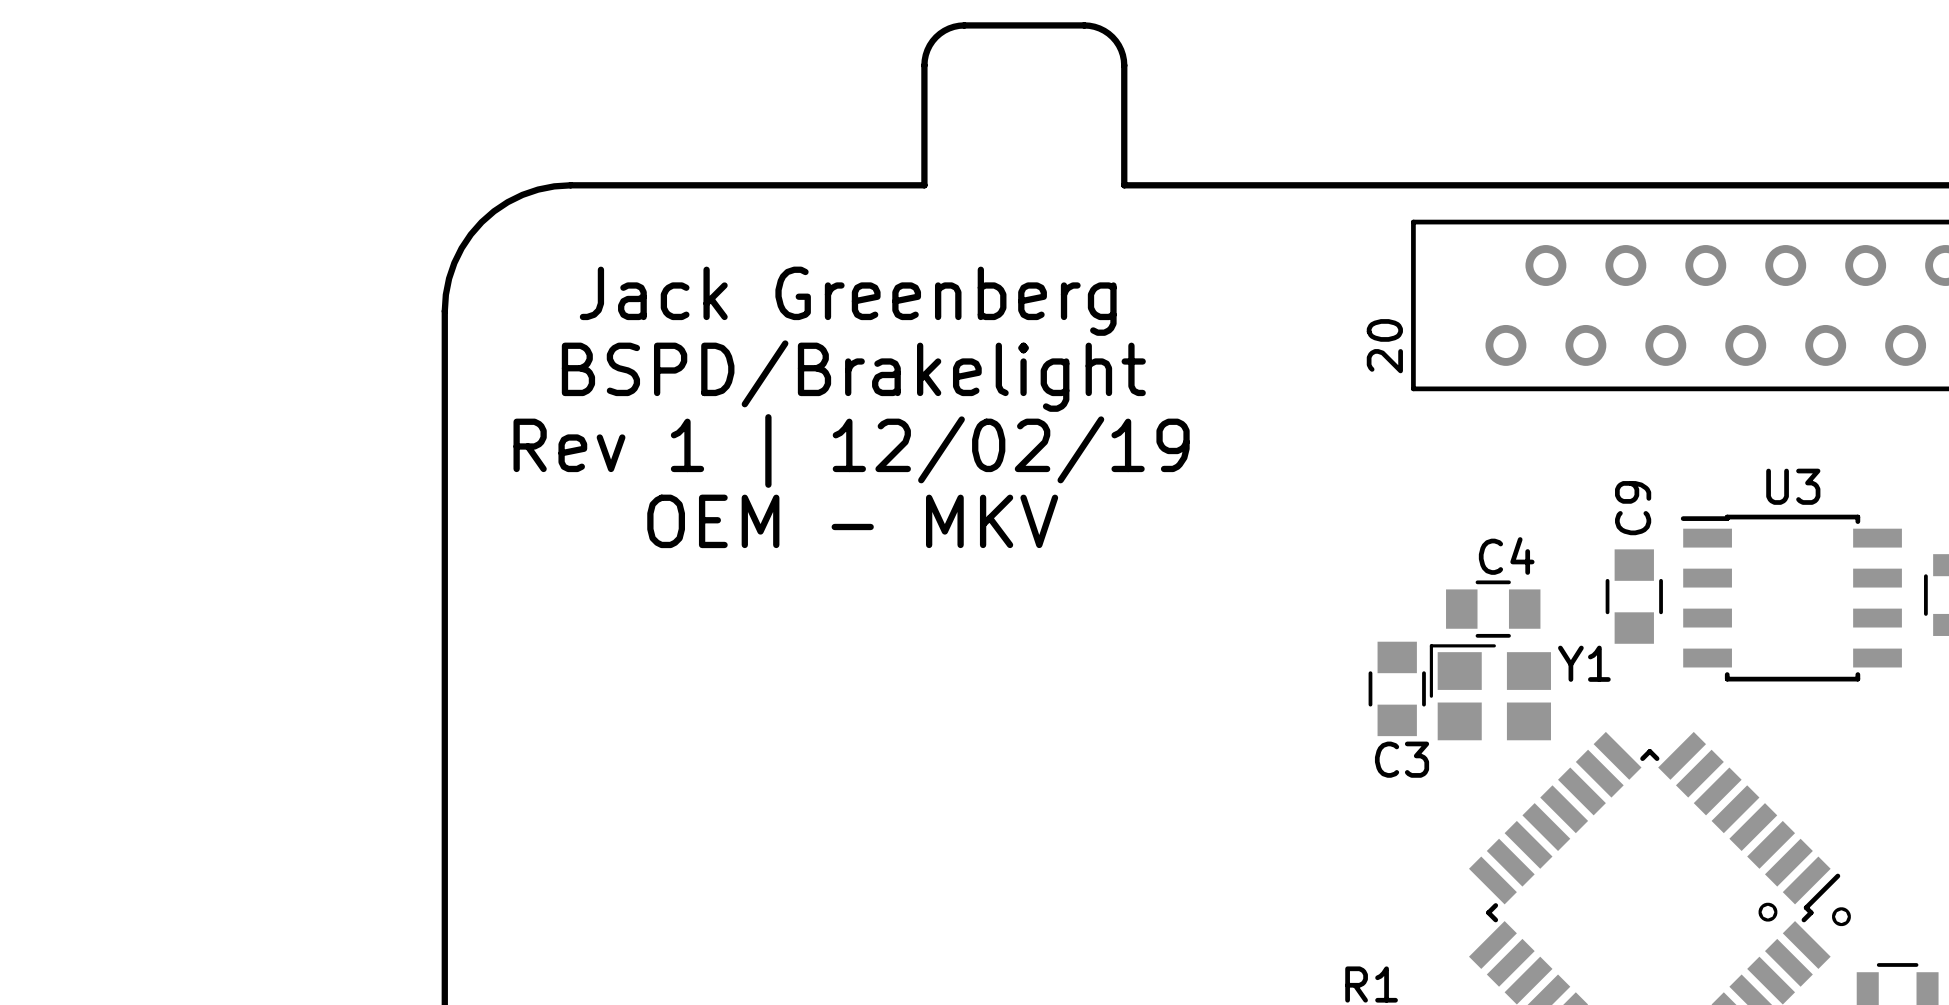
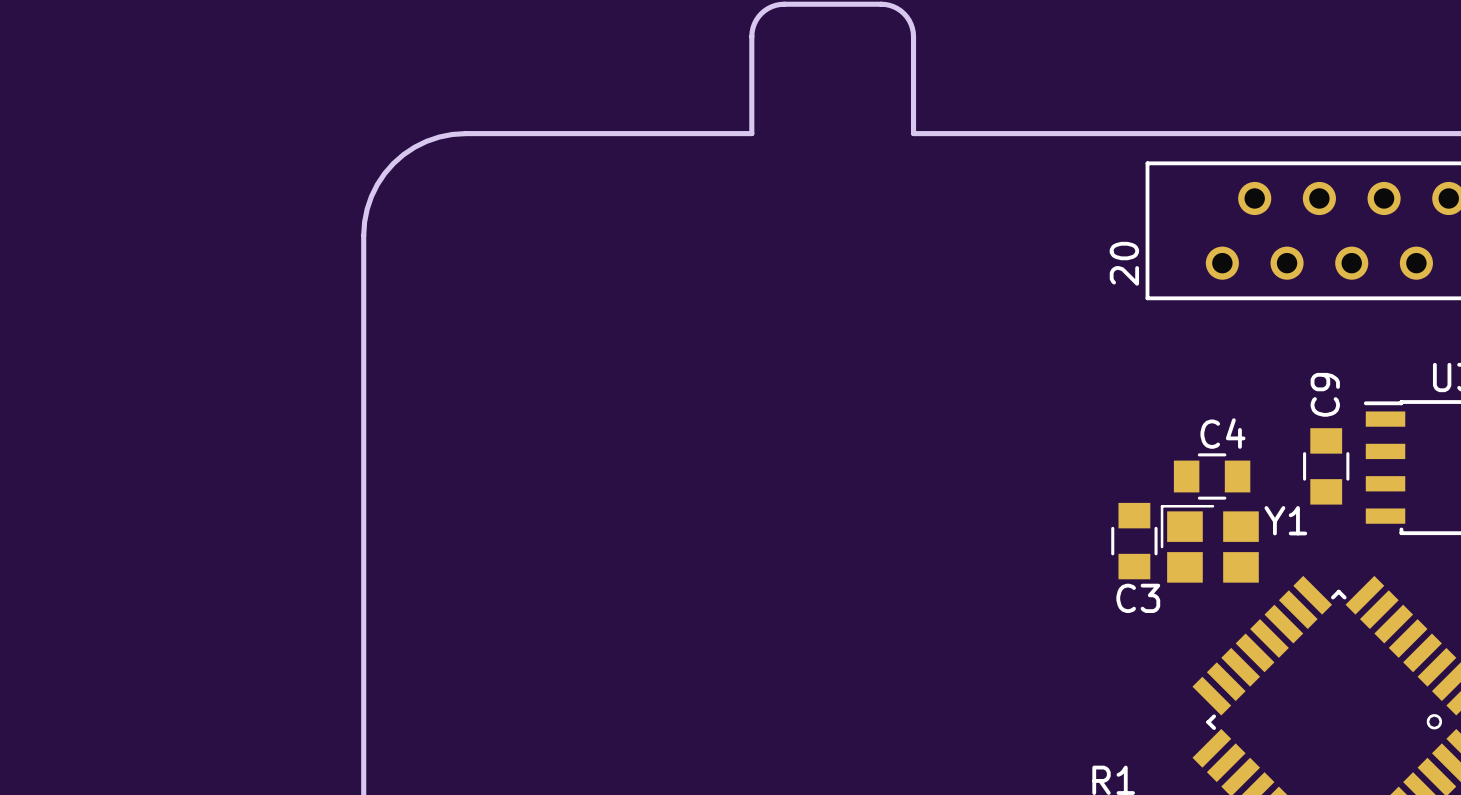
text: Jack Greenberg (848, 301) -> none
text: BSPD/Brakelight (853, 376) -> none
text: Rev 1 | 12/02/19 (851, 450) -> none
text: OEM - MKV (852, 521) -> none

